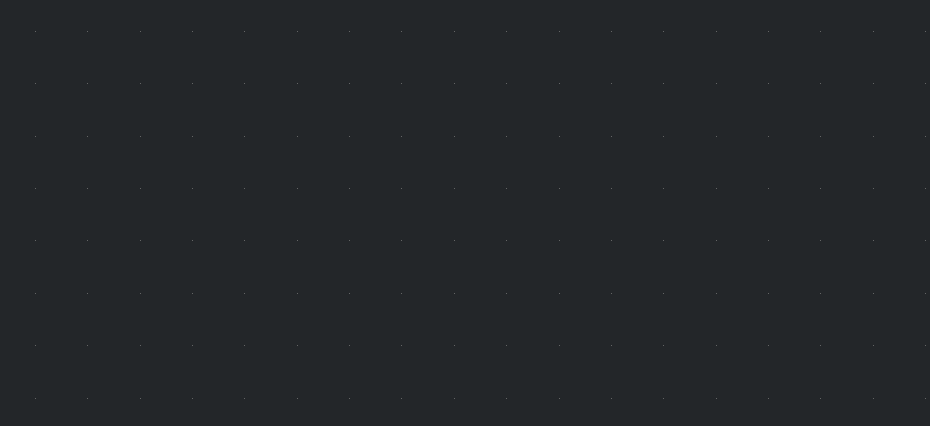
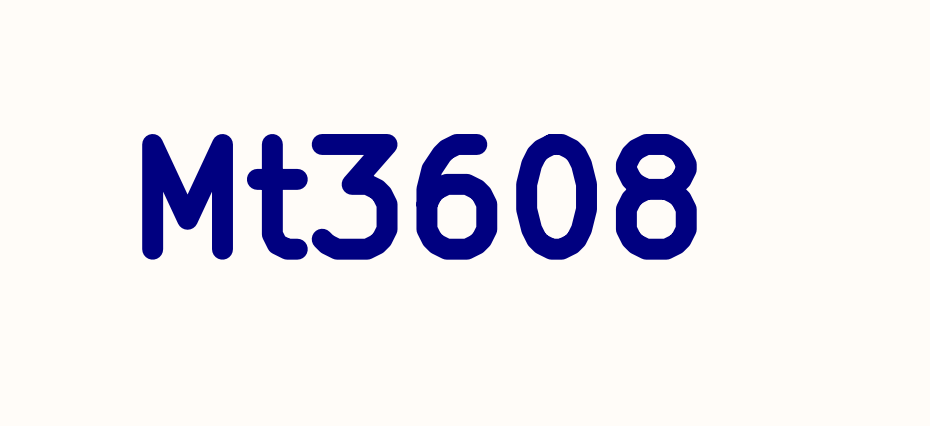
text: none -> Mt3608 (419, 196)

